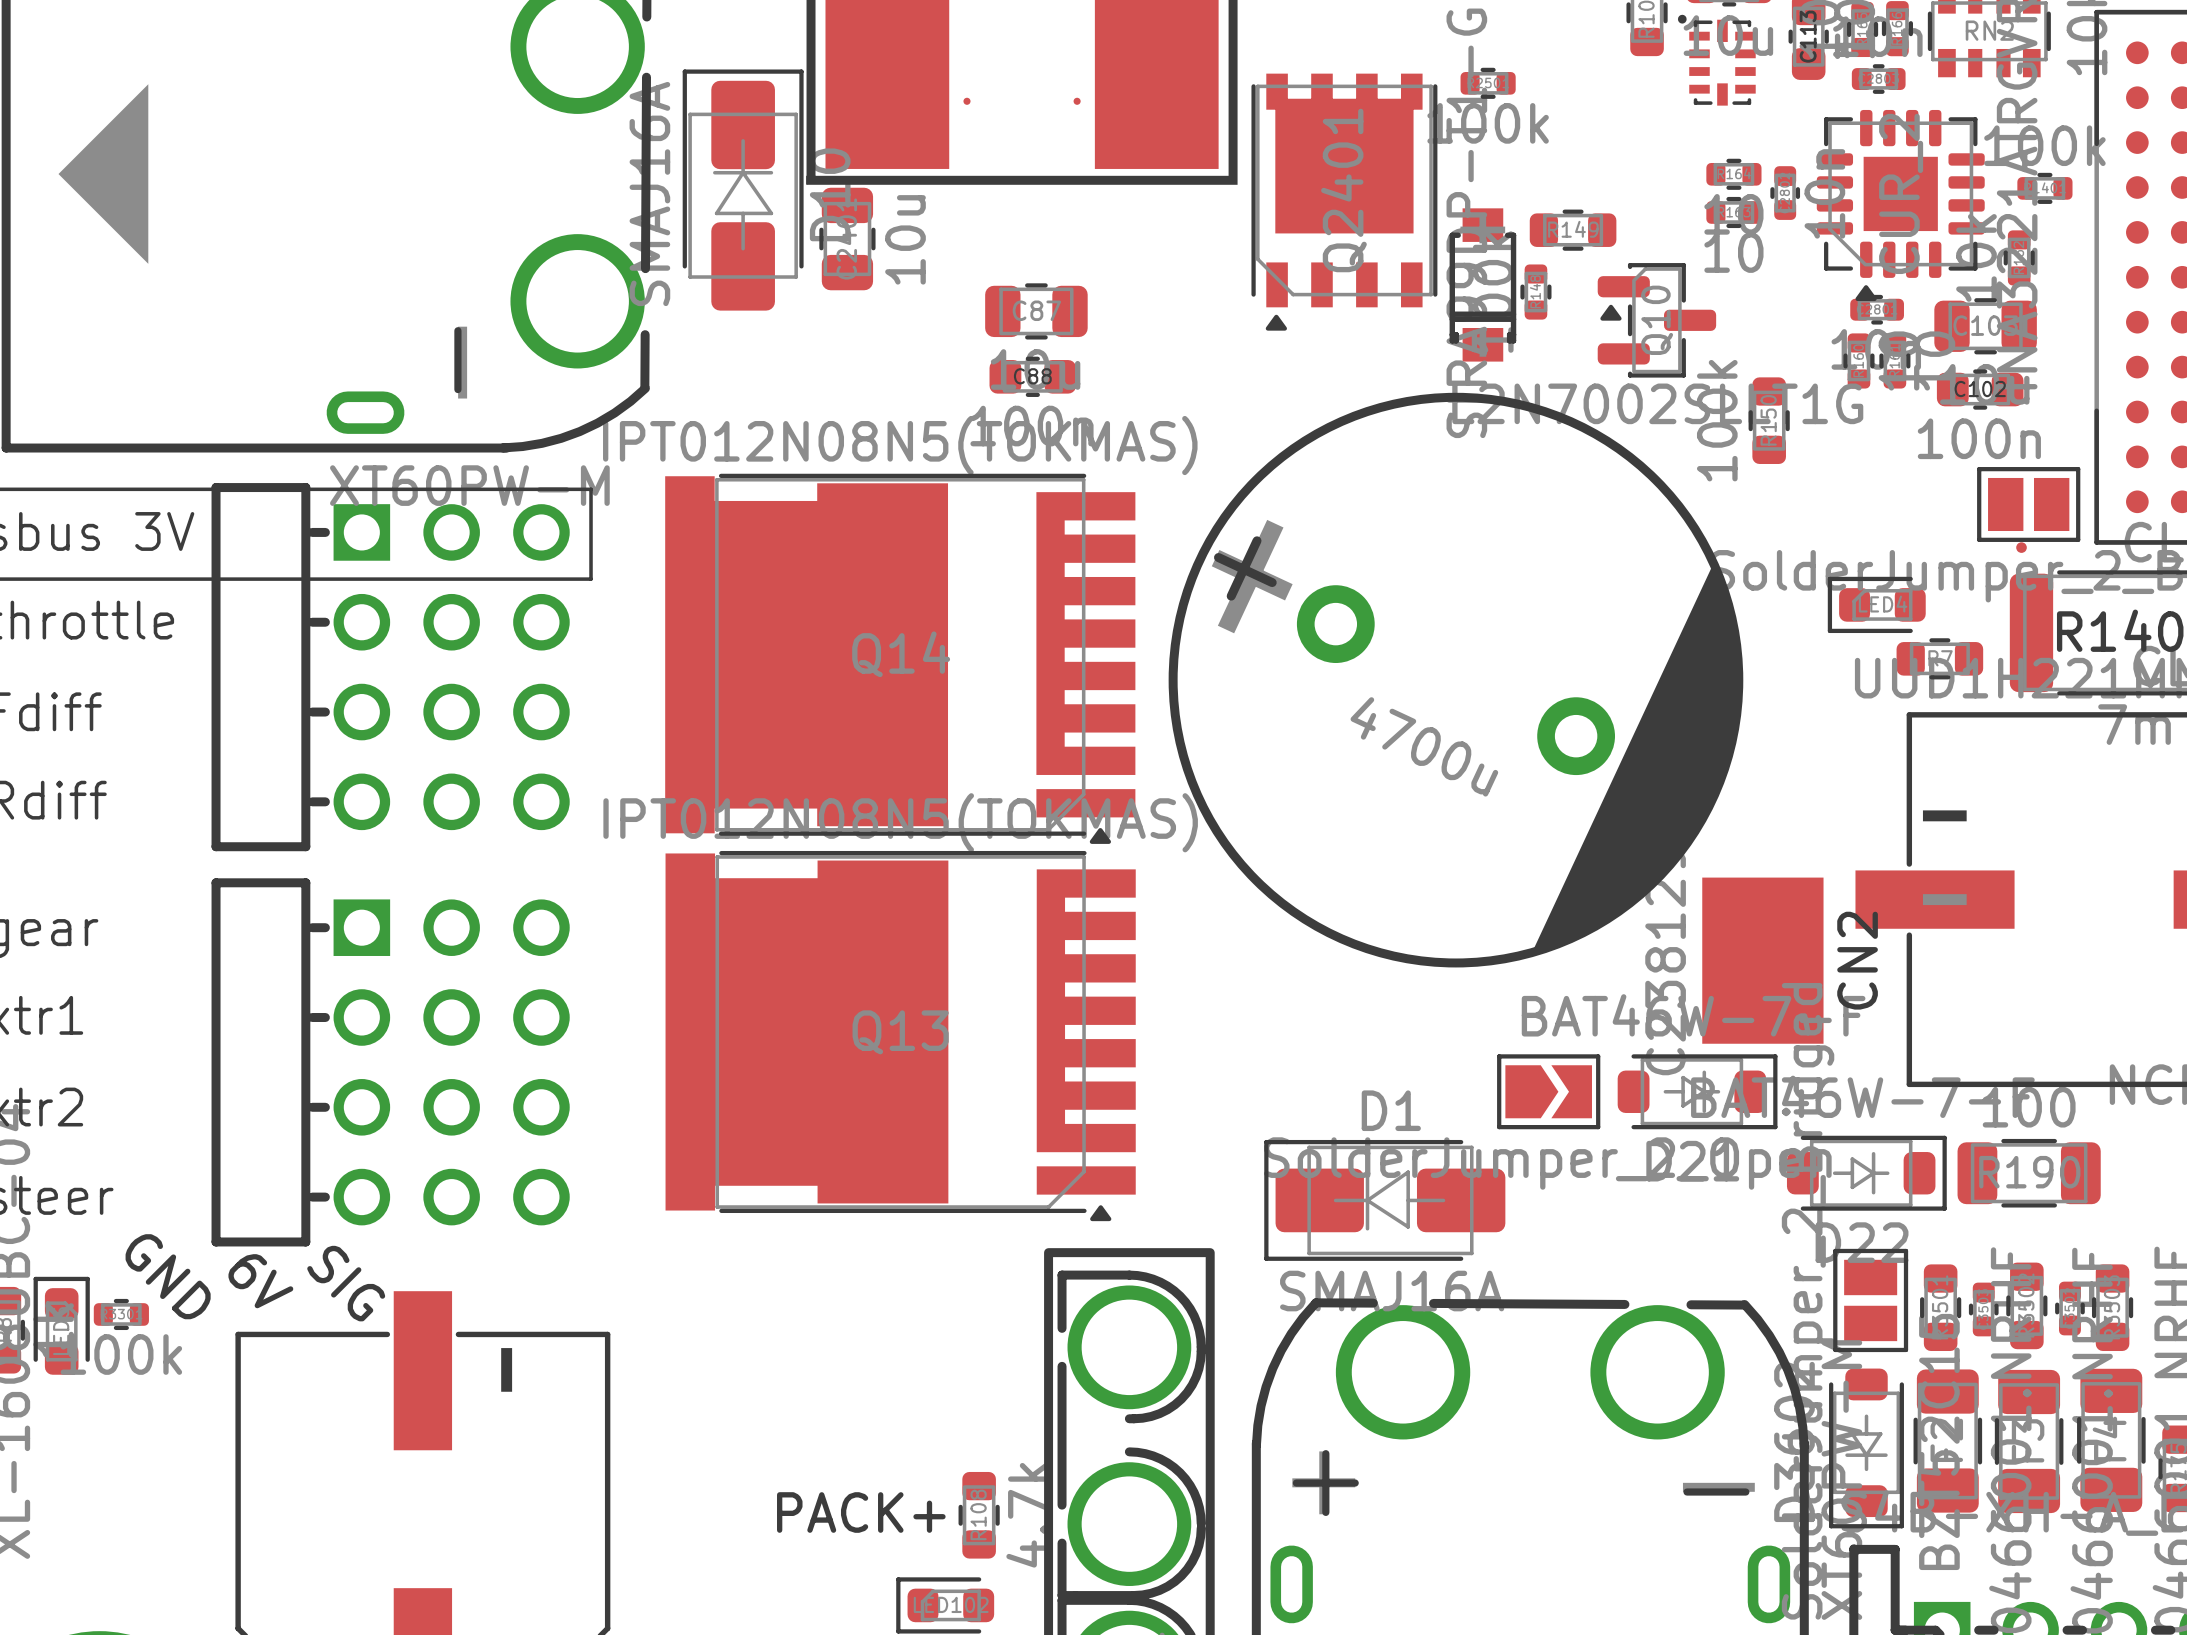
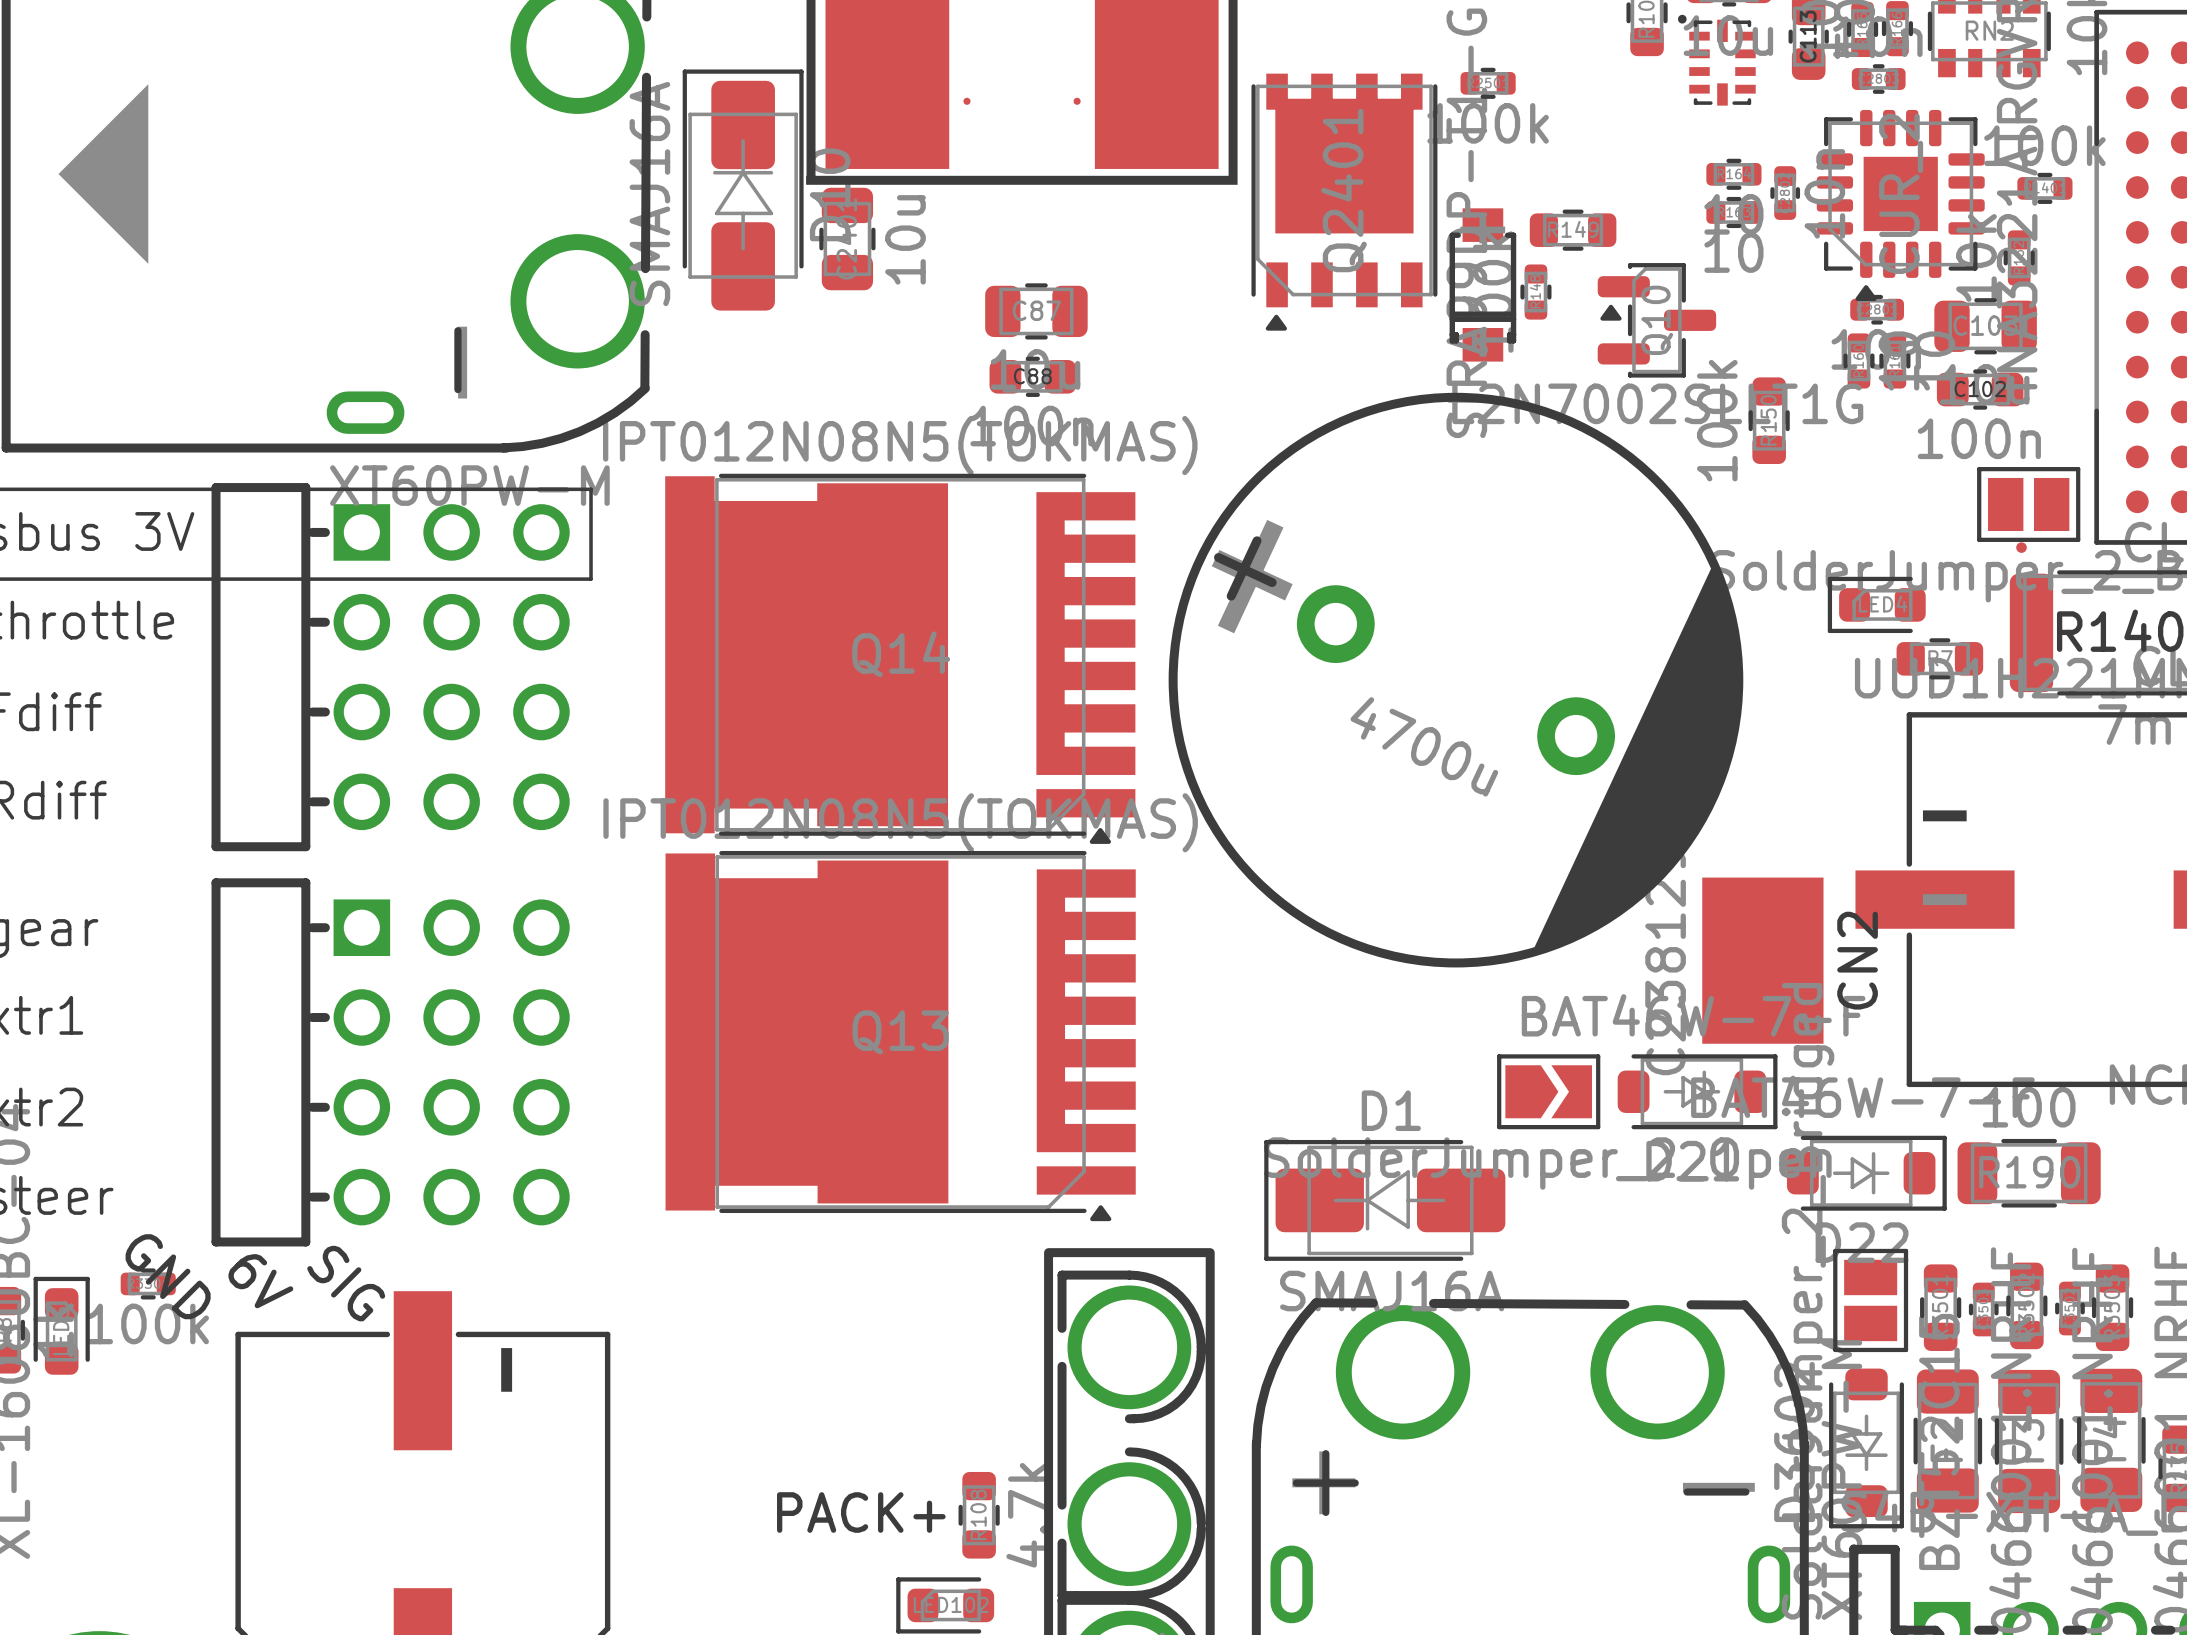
part position: (121, 1314) -> (148, 1283)

